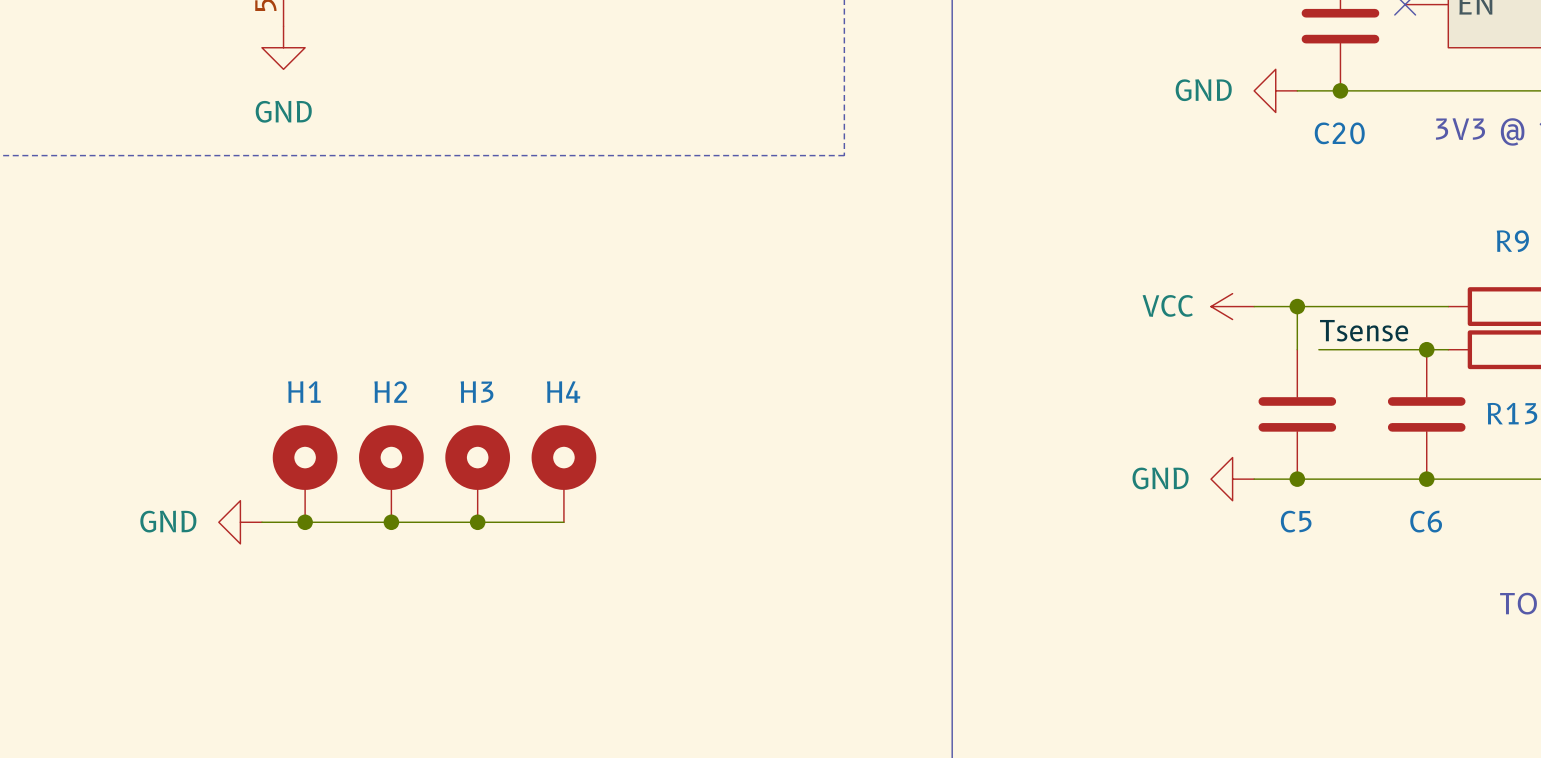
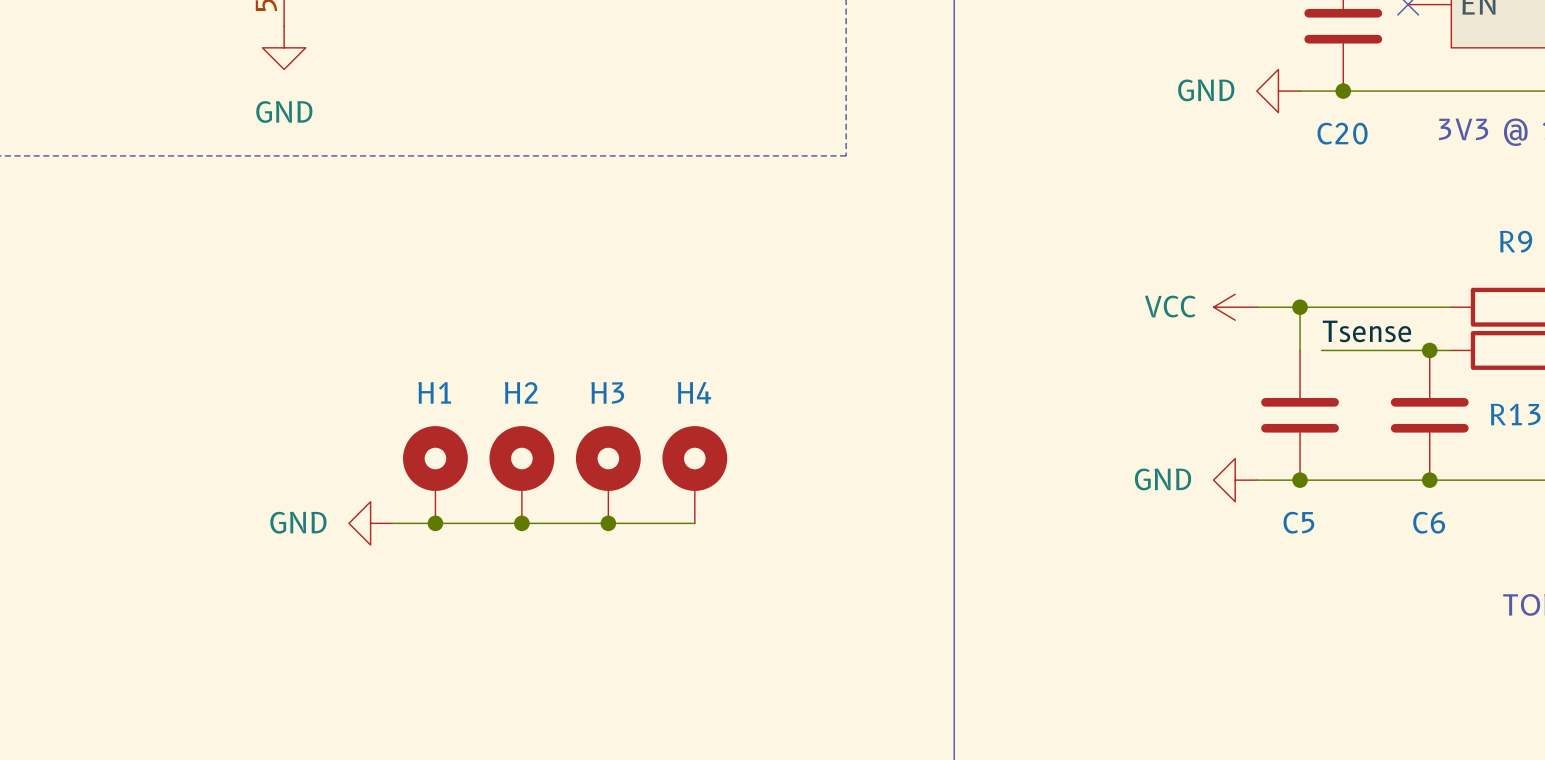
H1 position: (305, 473) -> (435, 474)
H2 position: (391, 473) -> (521, 474)
H3 position: (477, 473) -> (608, 474)
H4 position: (563, 473) -> (694, 474)
power symbol position: GND (240, 522) -> GND (370, 523)
wire: (261, 522) (391, 522) -> (565, 523) (694, 523)
junction: (305, 522) -> none
junction: (391, 522) -> none
junction: none -> (435, 523)
junction: (477, 522) -> none
junction: none -> (521, 523)
junction: none -> (608, 523)

